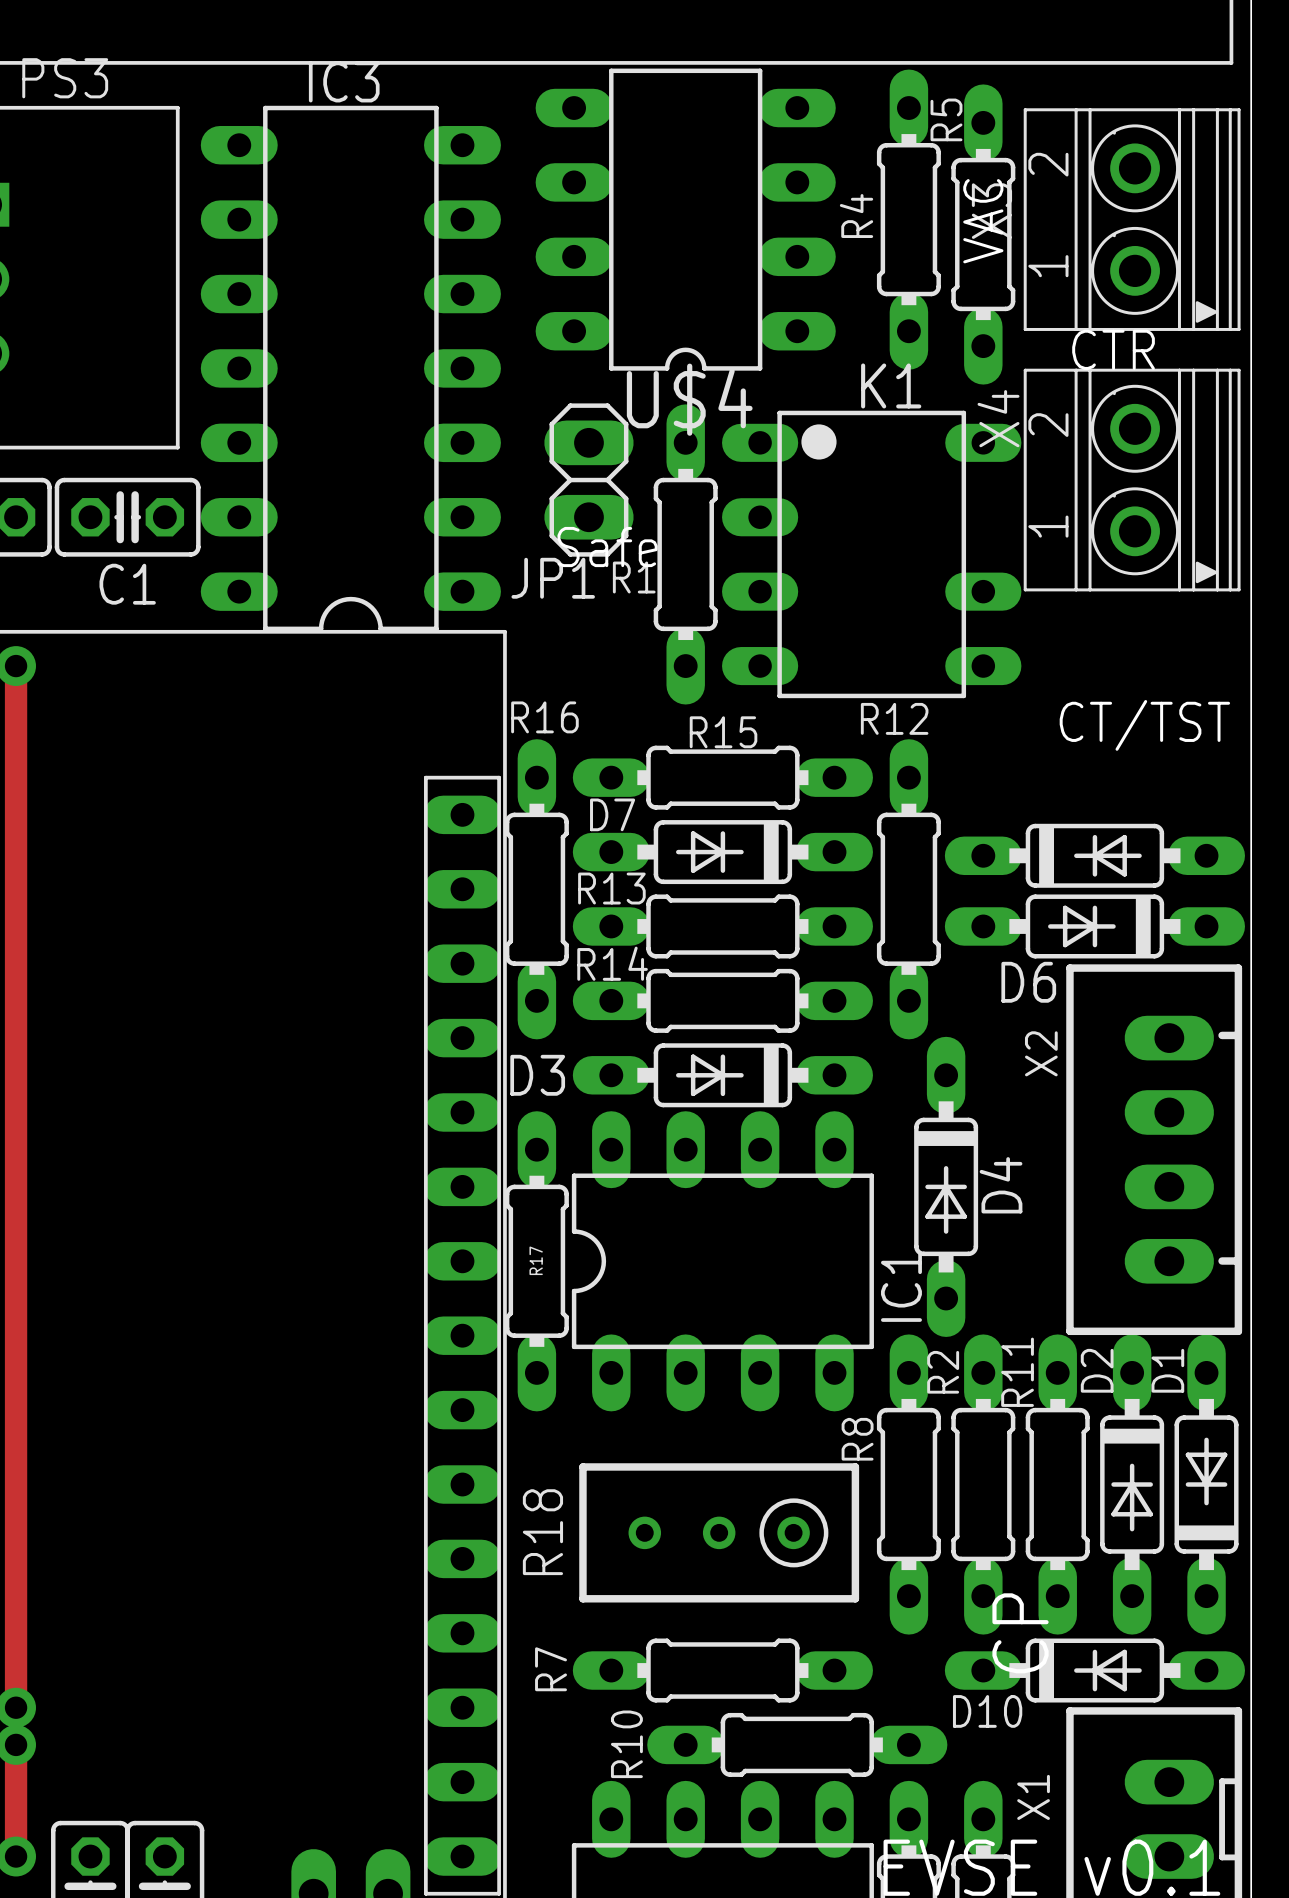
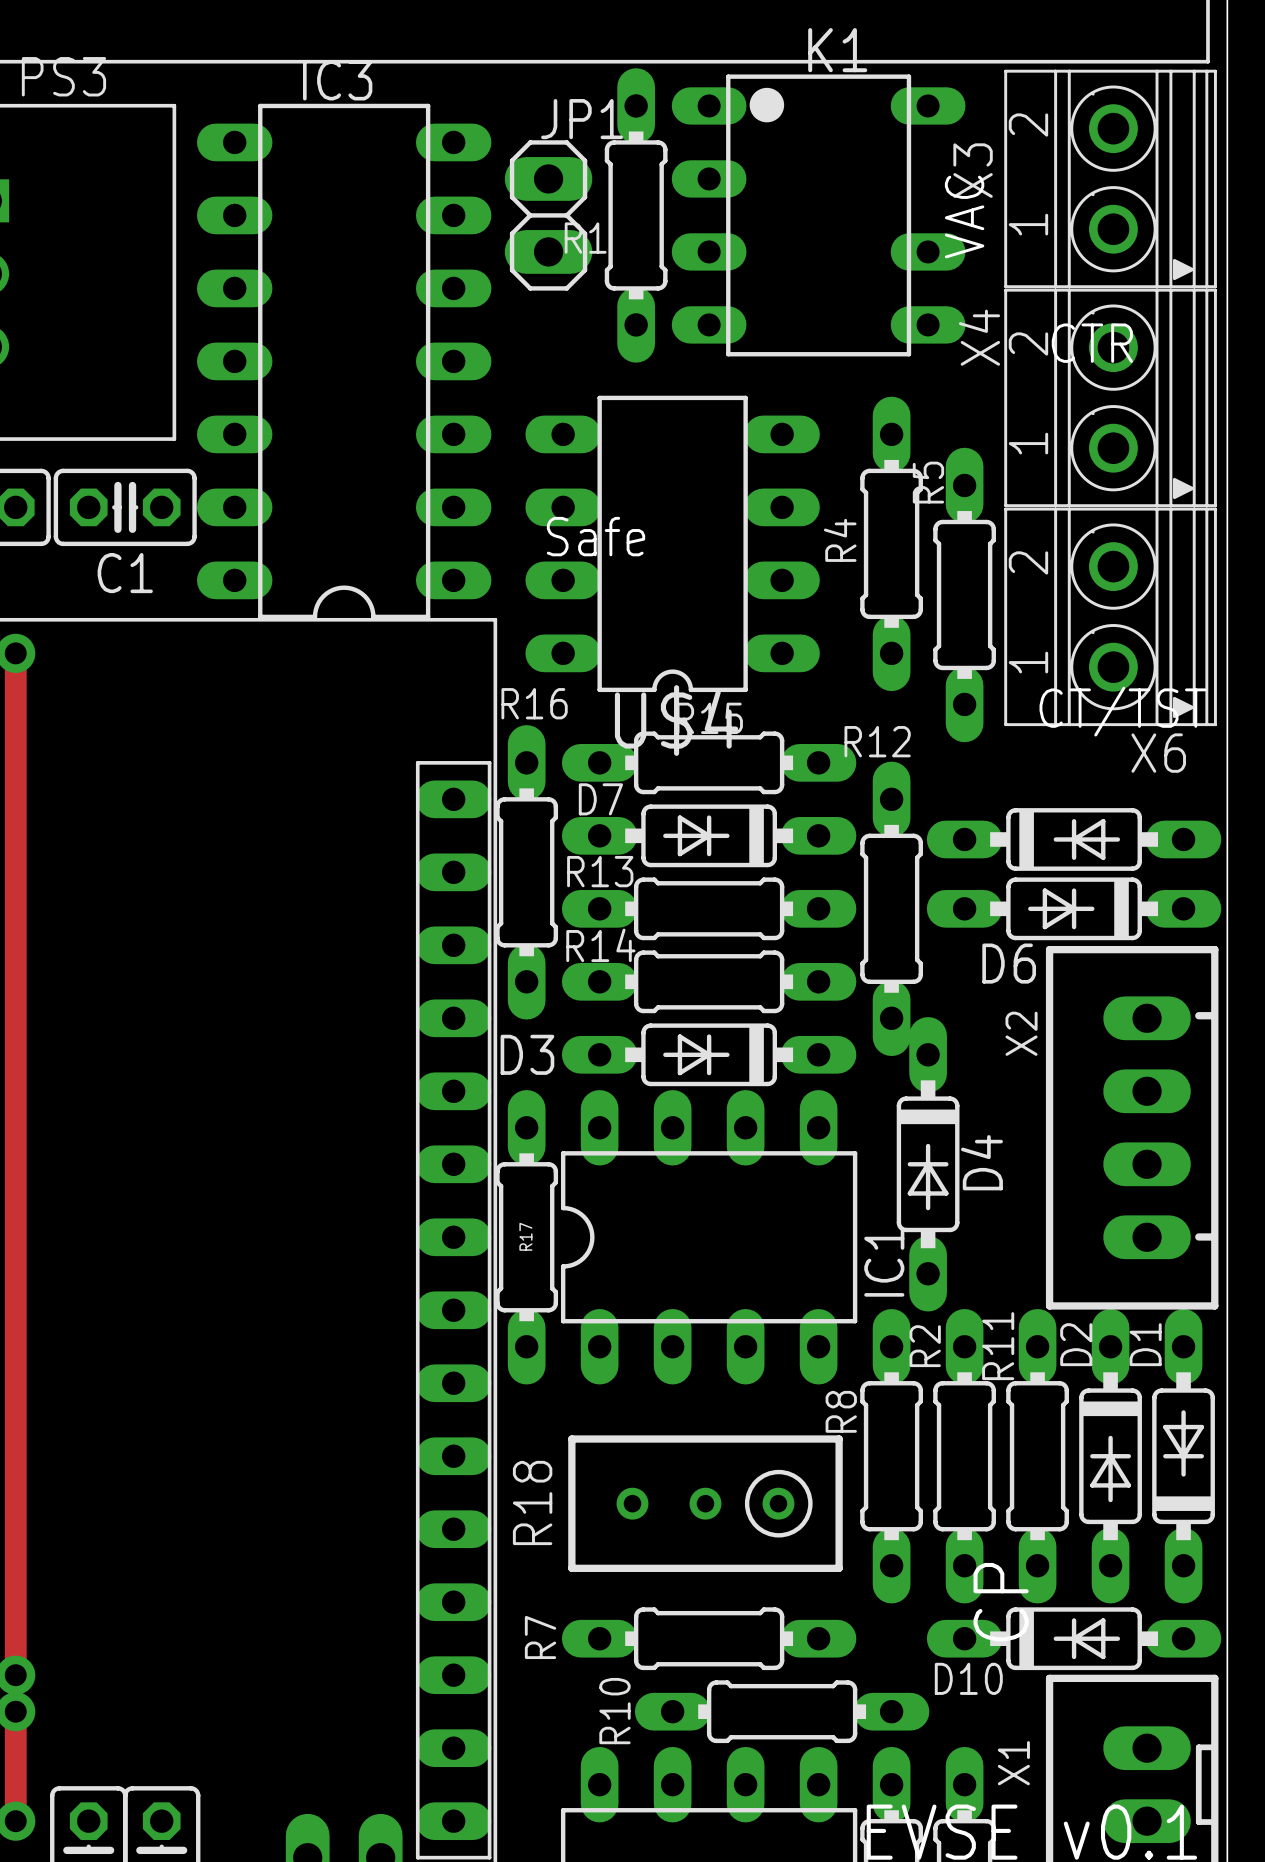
U$4 position: (685, 219) -> (672, 543)
R4 position: (908, 219) -> (891, 543)
X3 position: (1132, 219) -> (1110, 178)
R5 position: (983, 234) -> (964, 594)
JP1 position: (588, 480) -> (548, 215)
X4 position: (1132, 480) -> (1110, 397)
R1 position: (685, 554) -> (636, 215)
K1 position: (871, 554) -> (818, 215)
JP1 name position: JP1 (553, 578) -> JP1 (582, 119)
X6: none -> (1110, 616)
R12 position: (908, 889) -> (891, 908)

